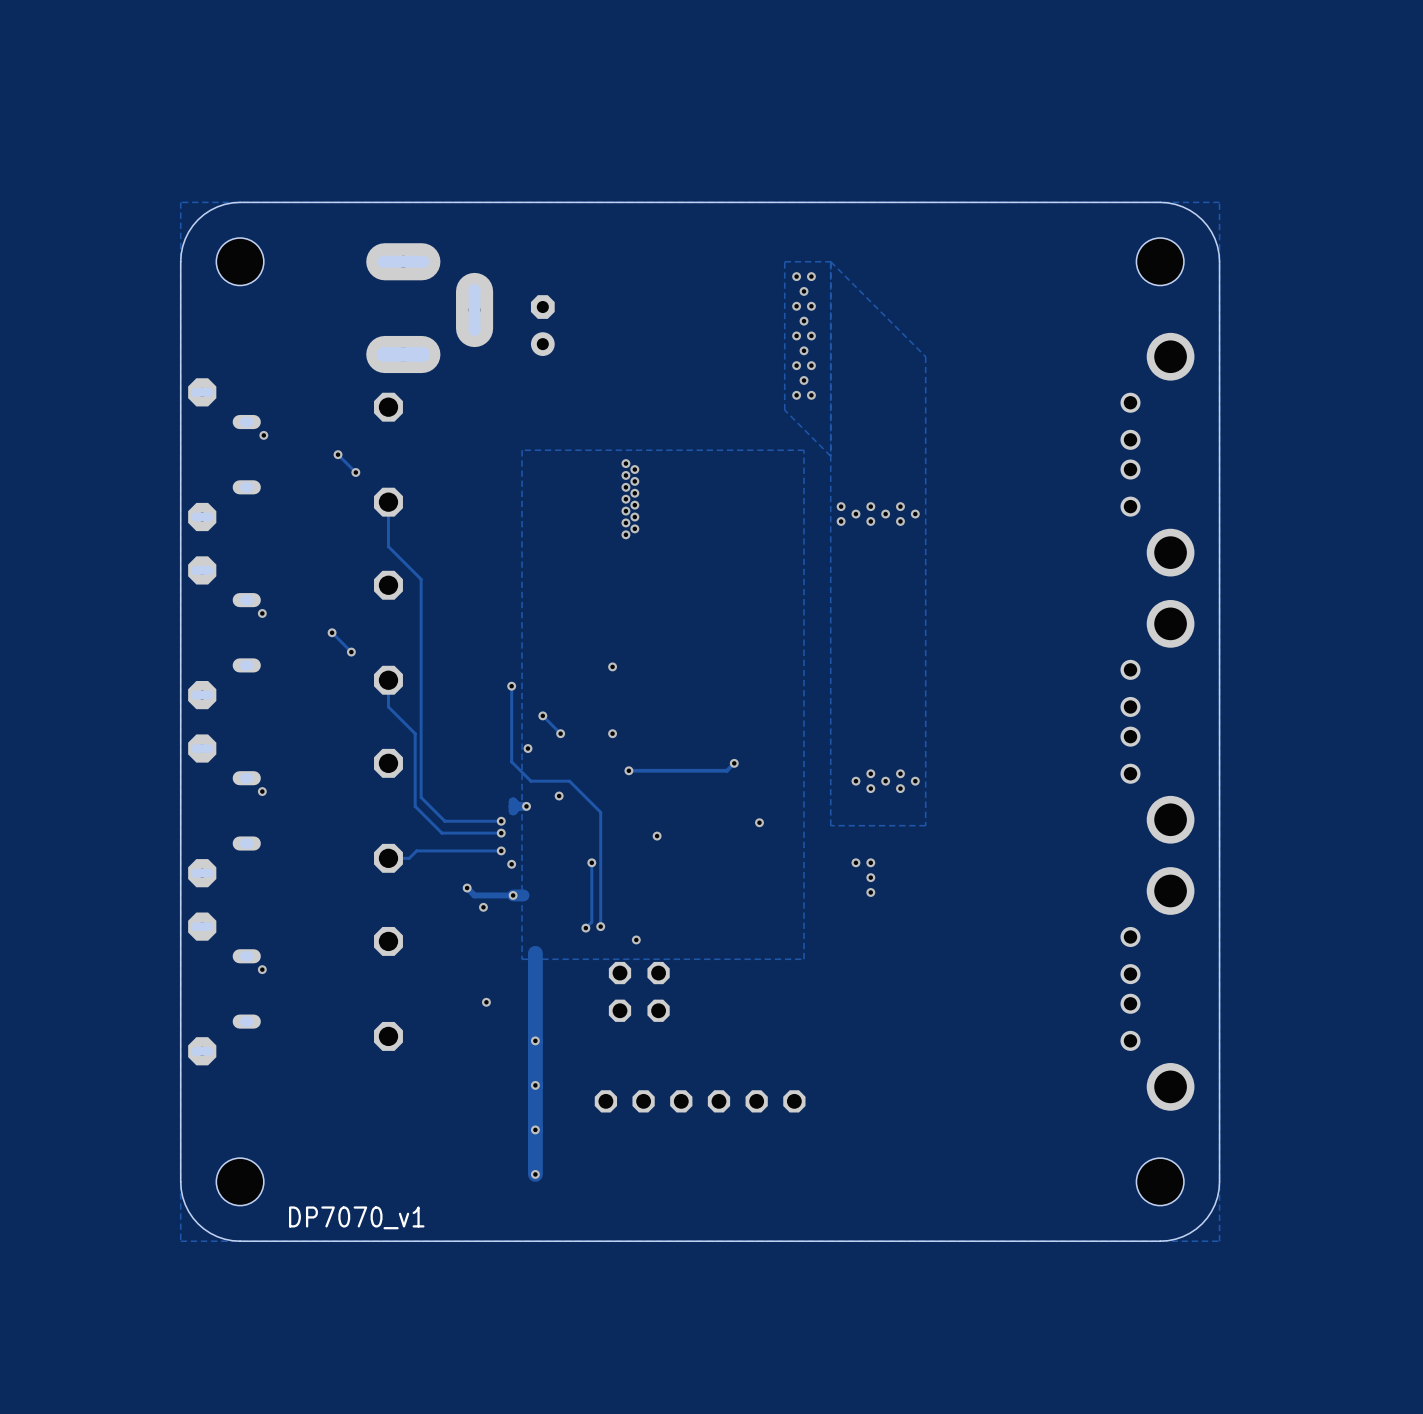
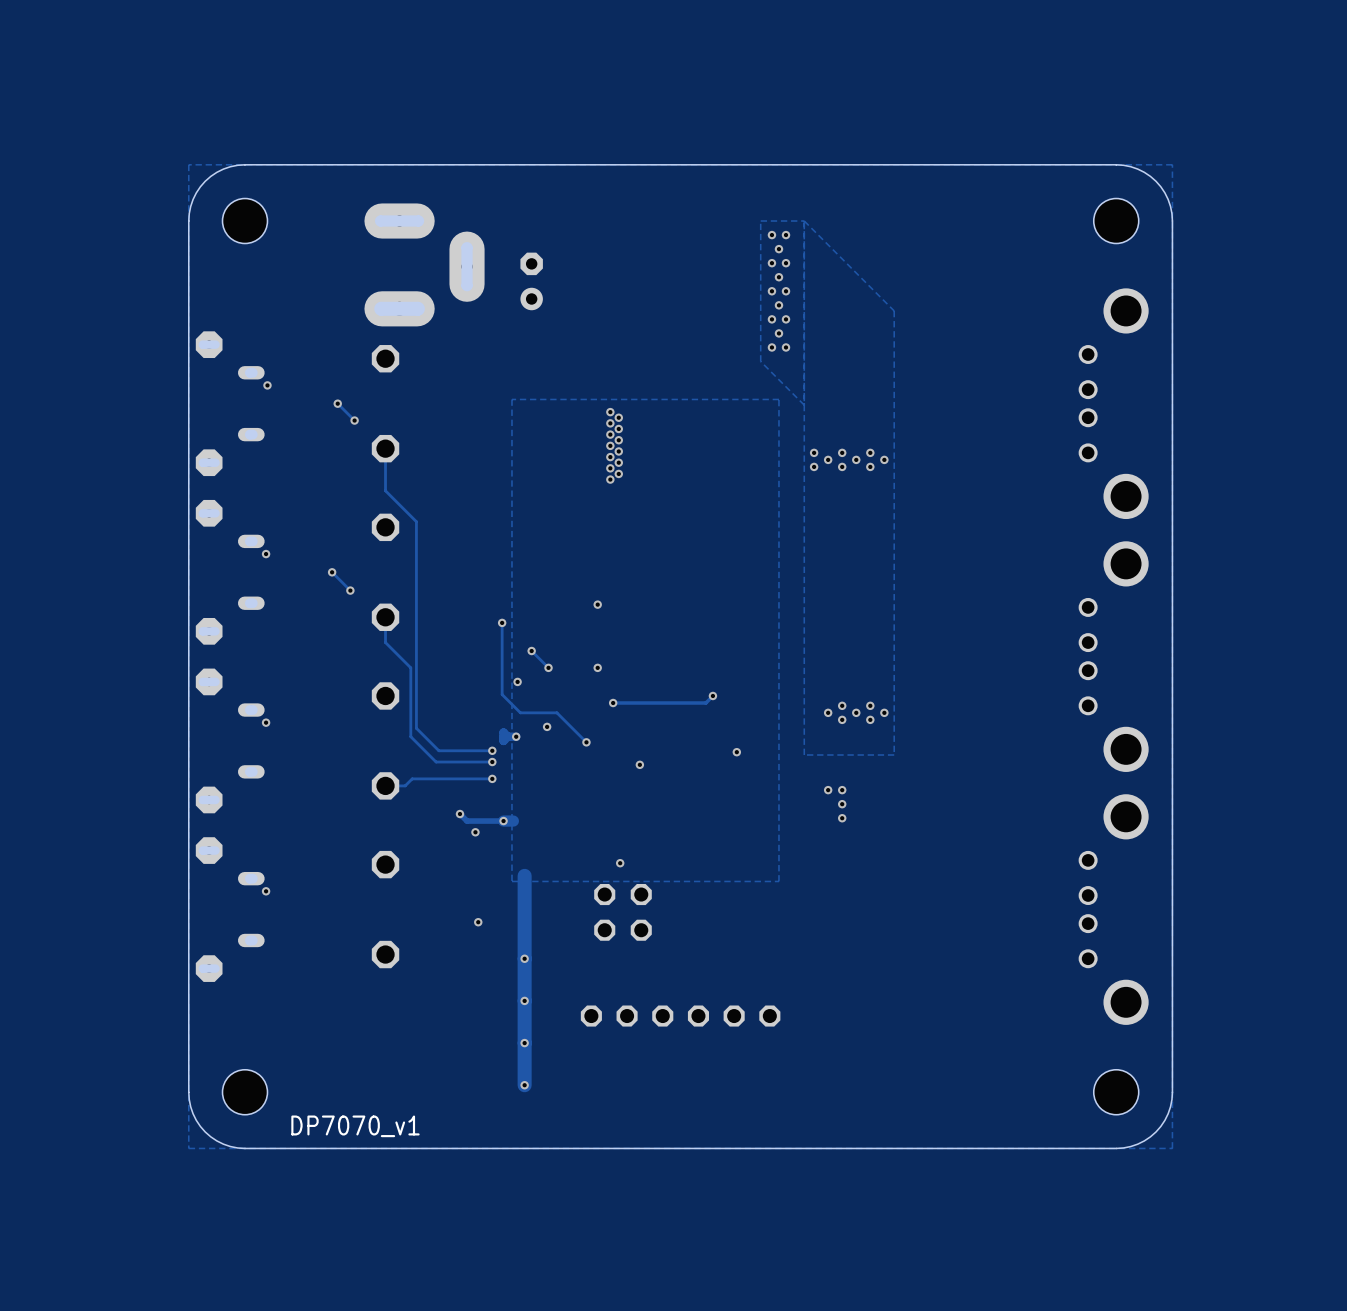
track: (600, 812) (600, 926) -> none
track: (591, 862) (591, 922) (585, 928) -> none
via position: (591, 862) -> (586, 742)
via: (511, 864) -> none
via: (600, 926) -> none
via: (585, 928) -> none

